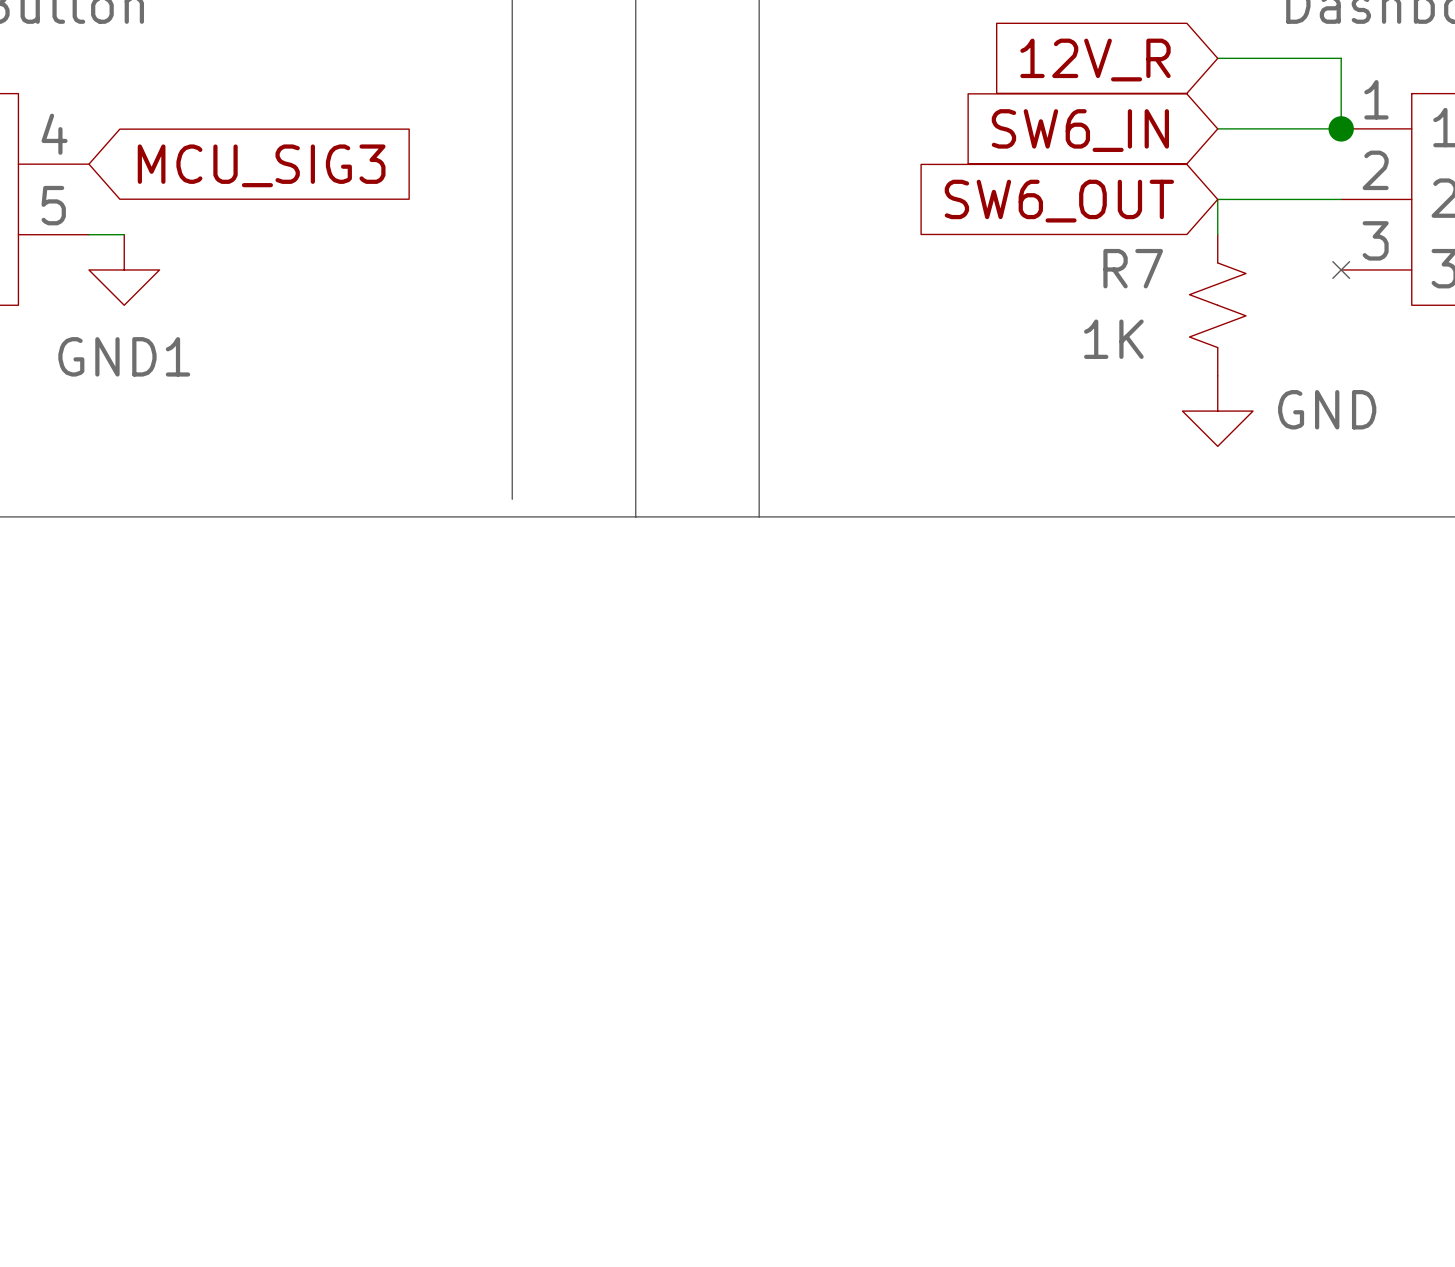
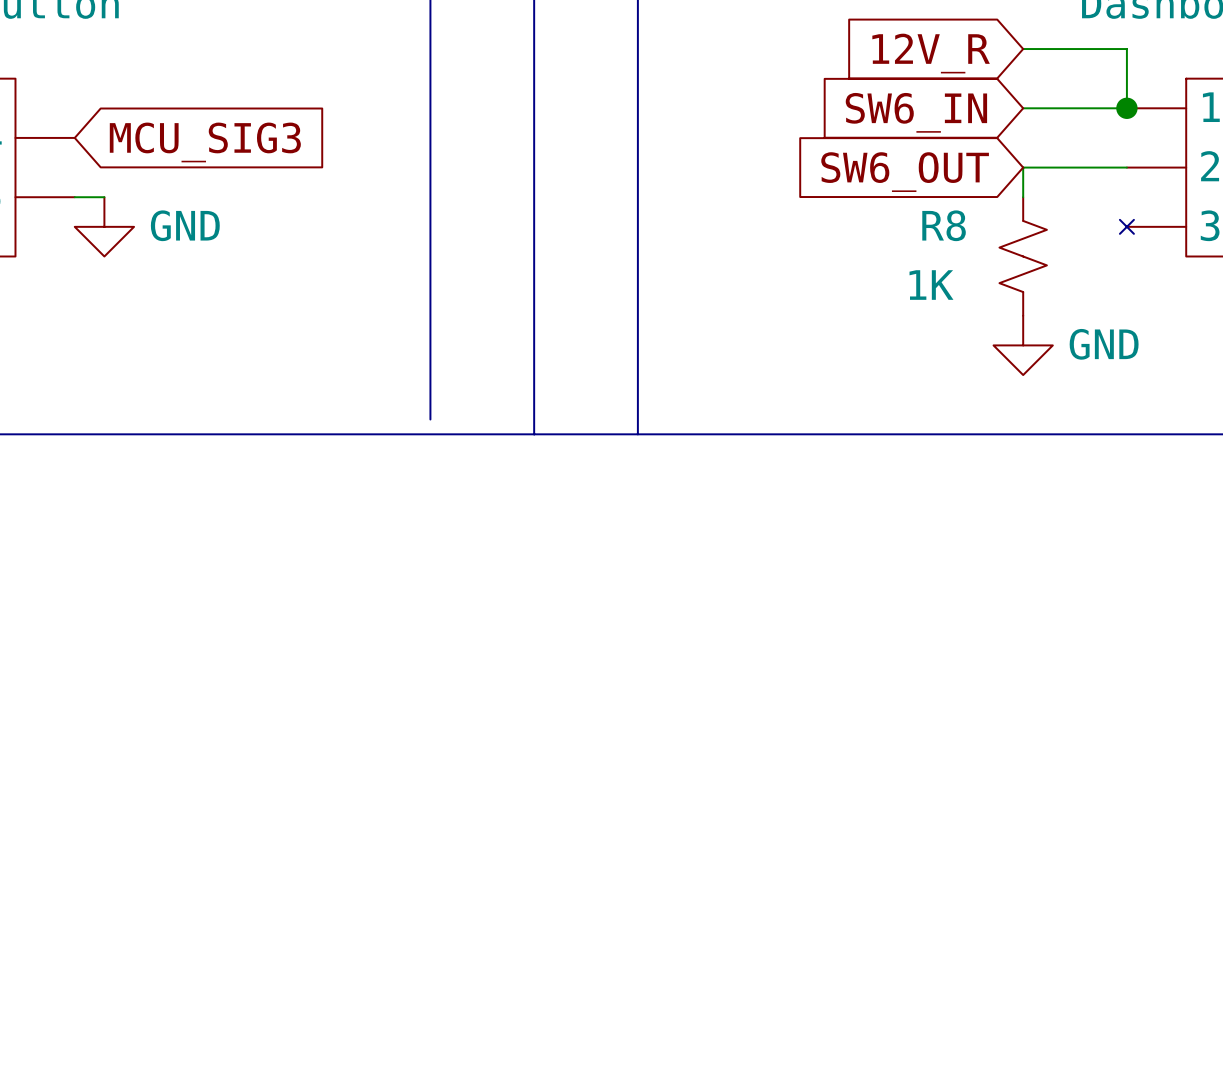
part pin number: 1 (1376, 99) -> none
part pin number: 4 (54, 134) -> none
part pin number: 2 (1375, 170) -> none
part pin number: 5 (53, 205) -> none
part pin number: 3 (1375, 240) -> none
R7 name: R7 (1133, 268) -> R8 (944, 225)
power symbol: GND1 (124, 269) -> GND (104, 226)

